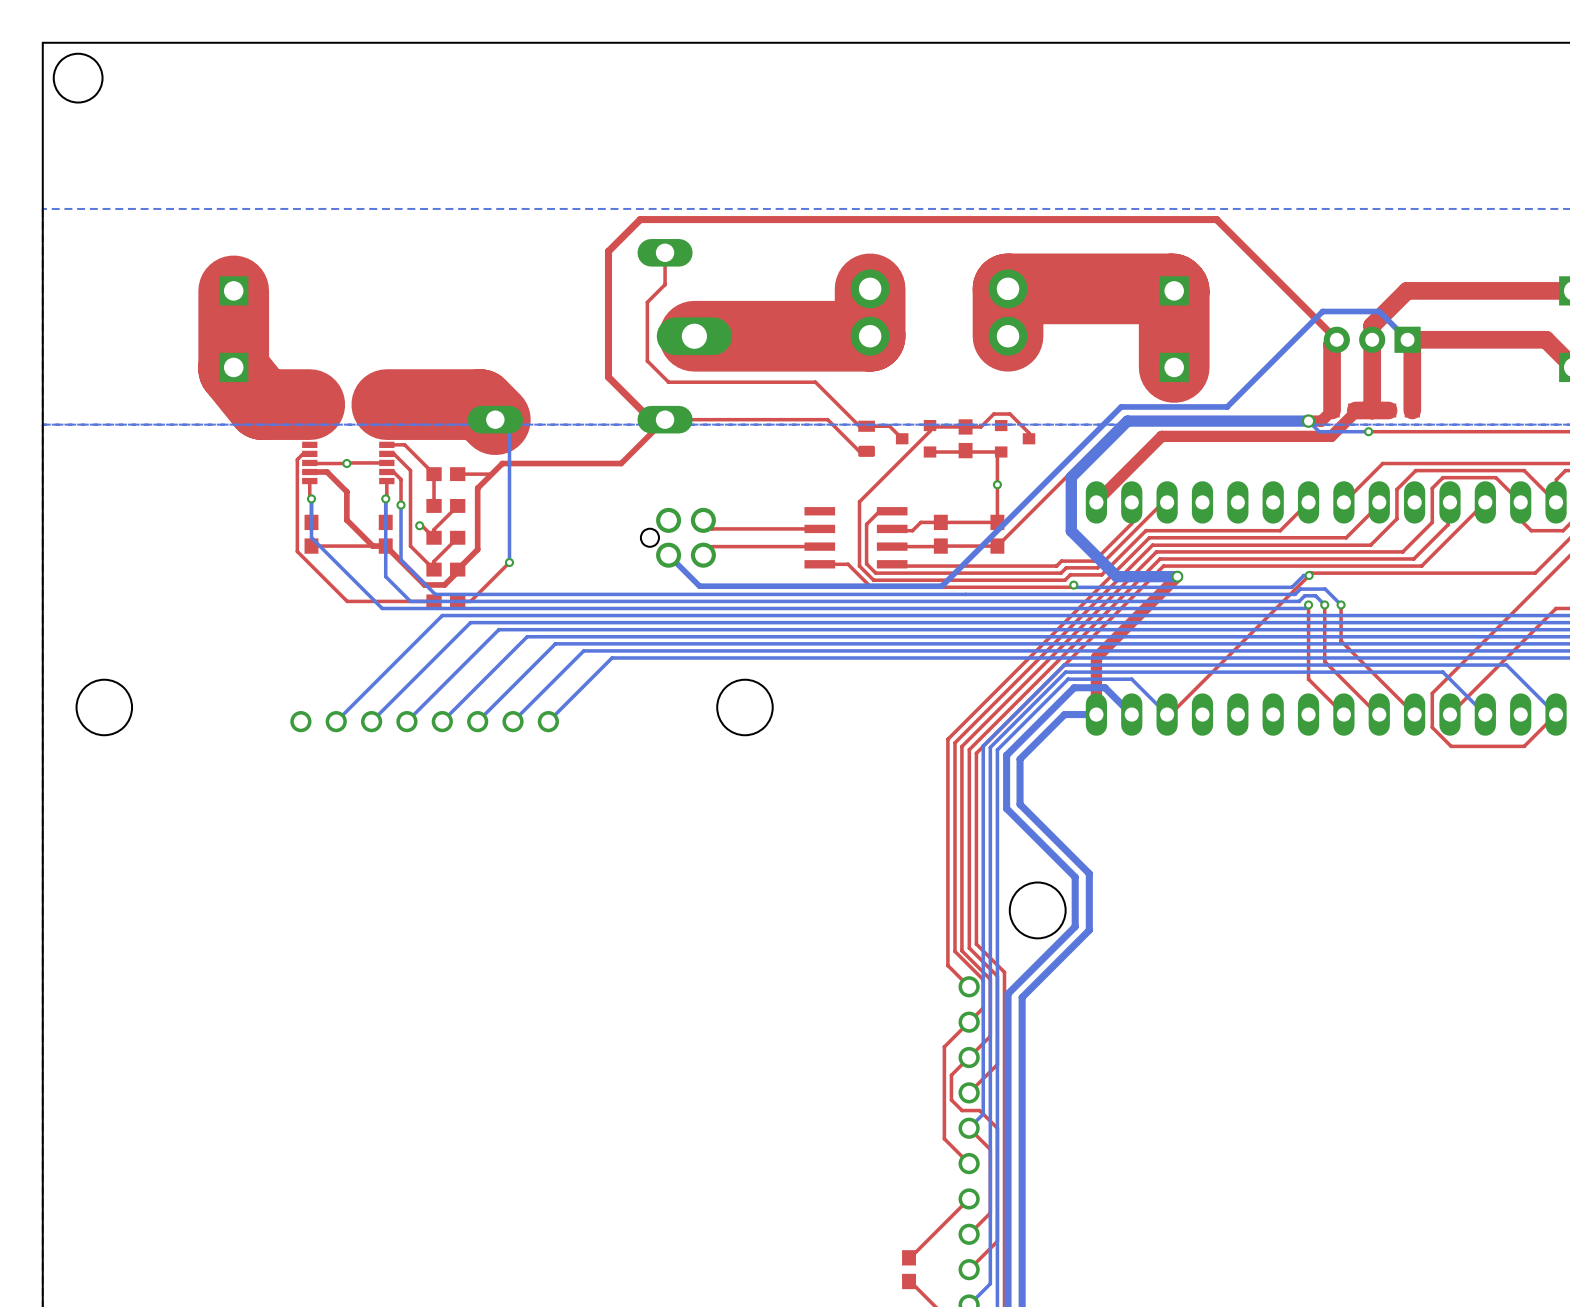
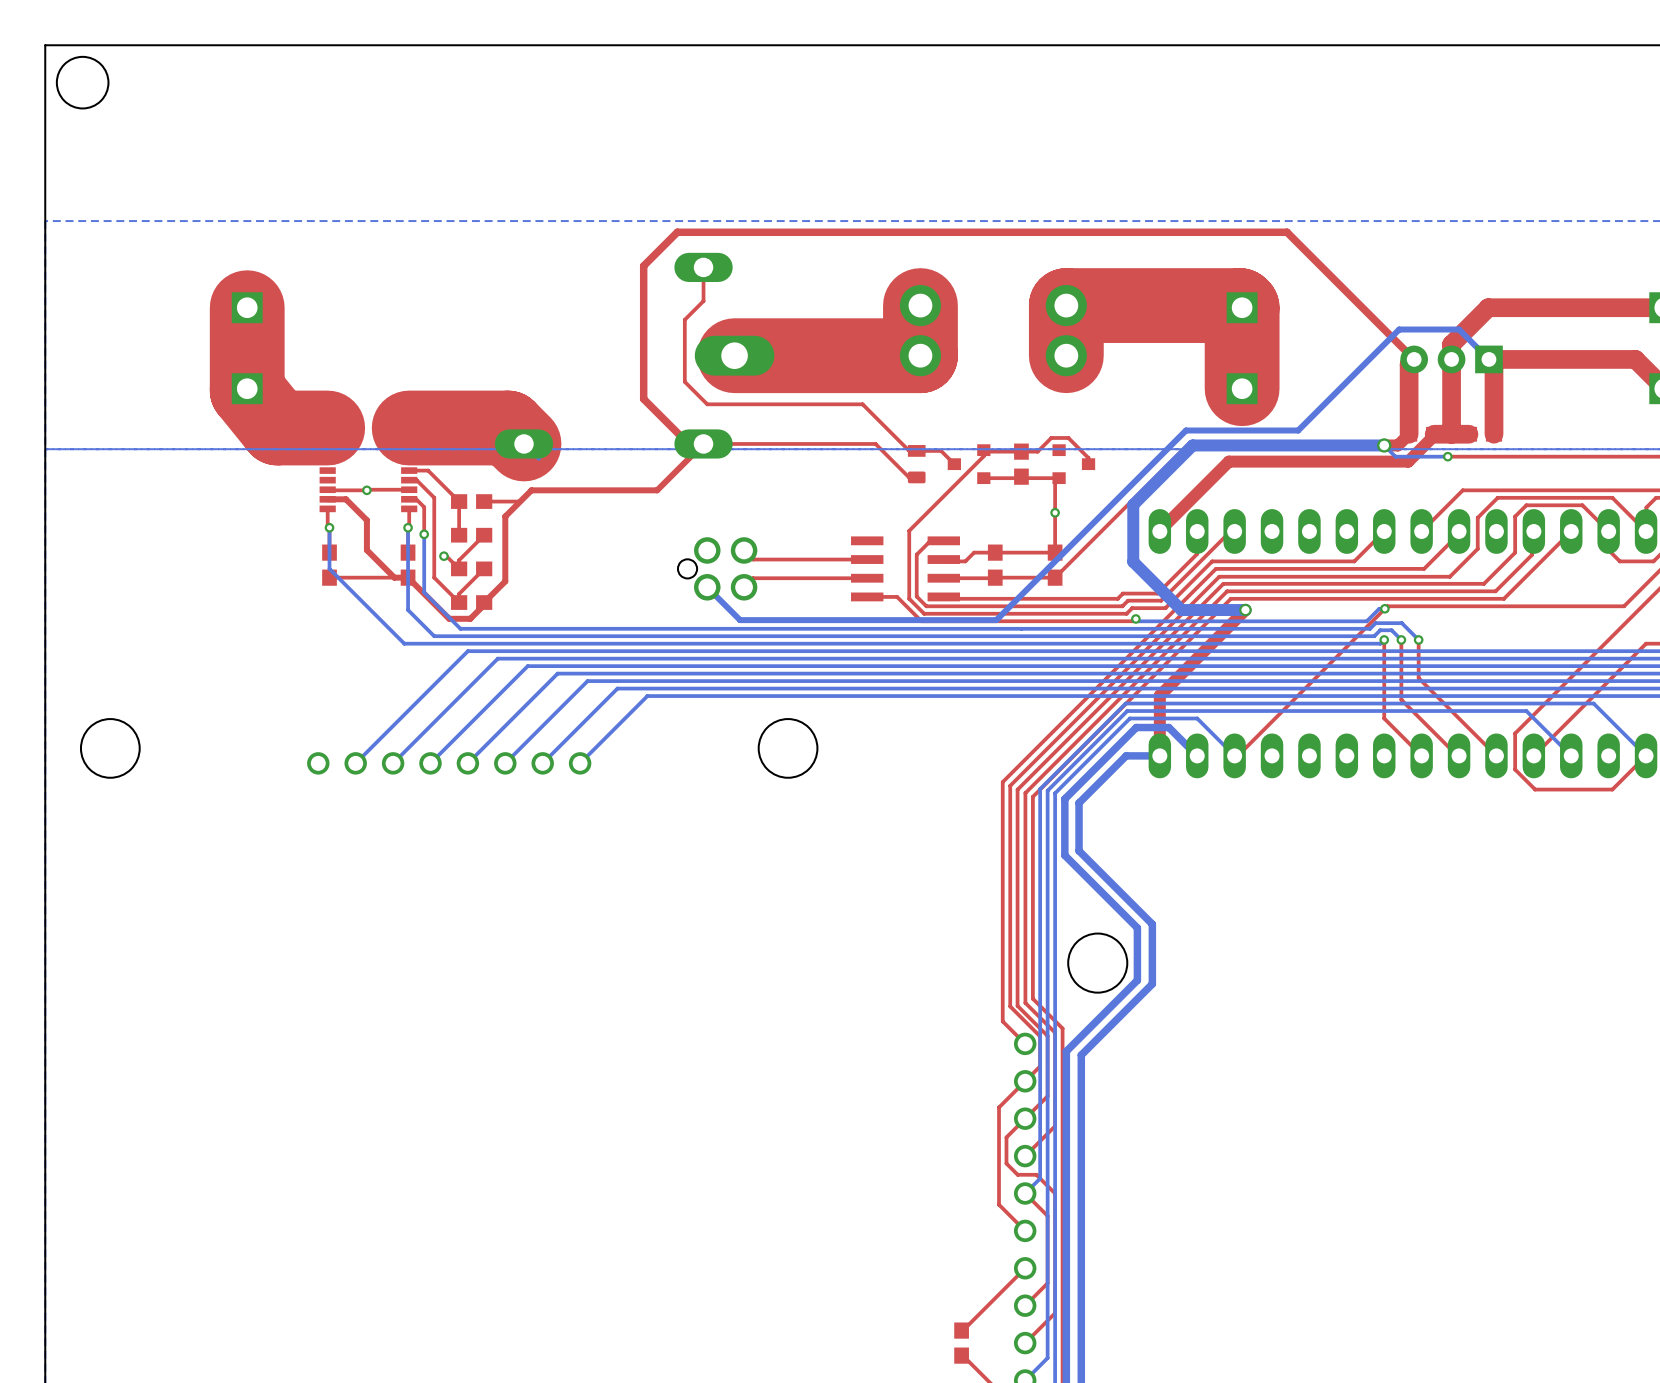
bottom track: (509, 433) (509, 562) -> none
top track: (309, 453) (302, 454) (297, 459) (297, 551) (347, 601) (434, 601) -> none
top track: (509, 562) (470, 601) (457, 601) -> none
via: (509, 562) -> none
part: (445, 601) -> none

